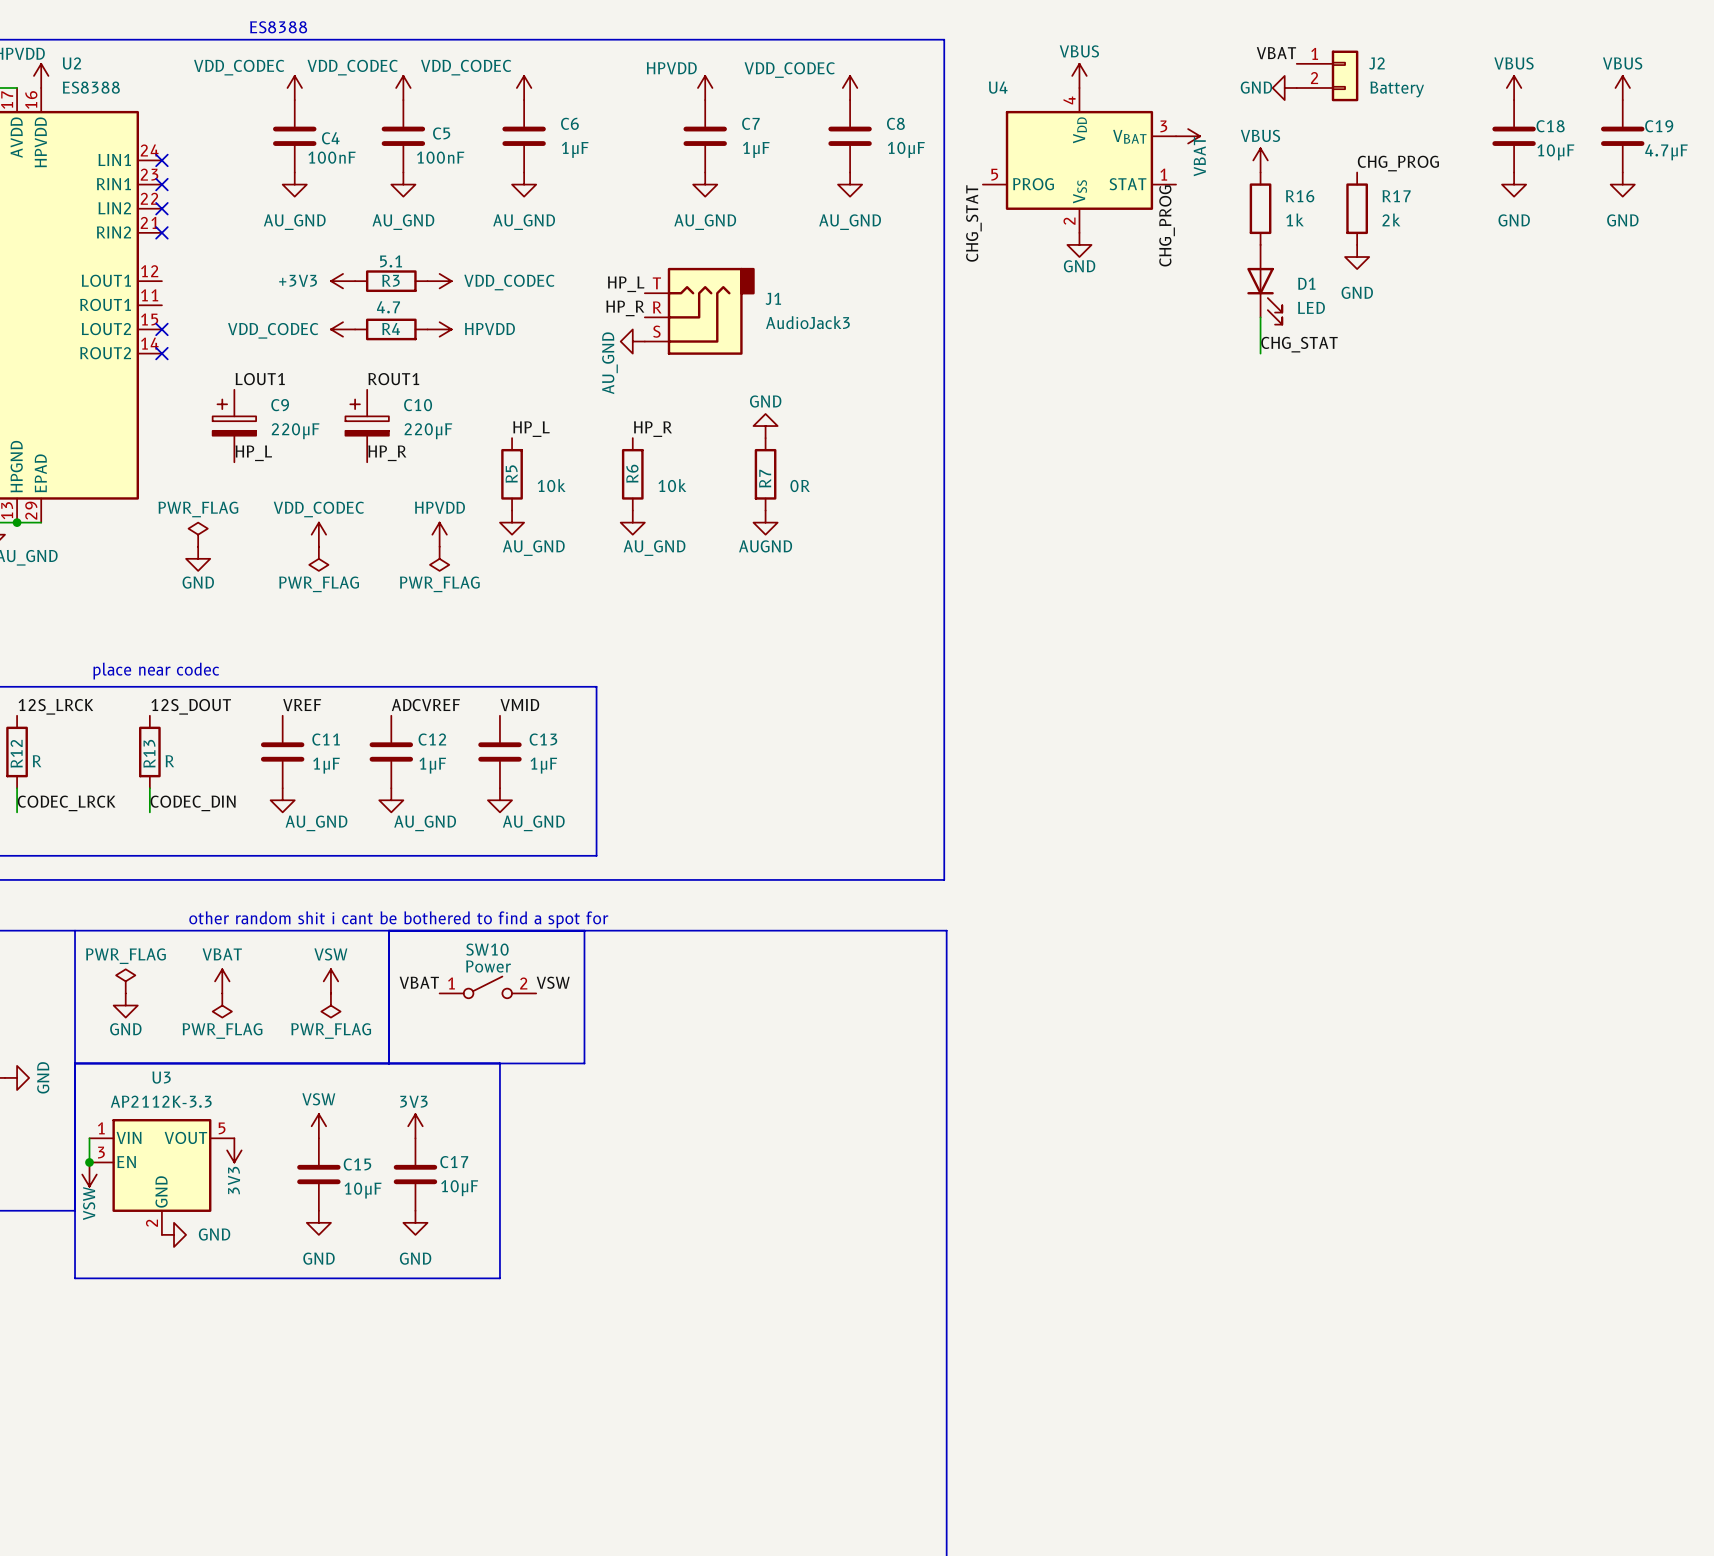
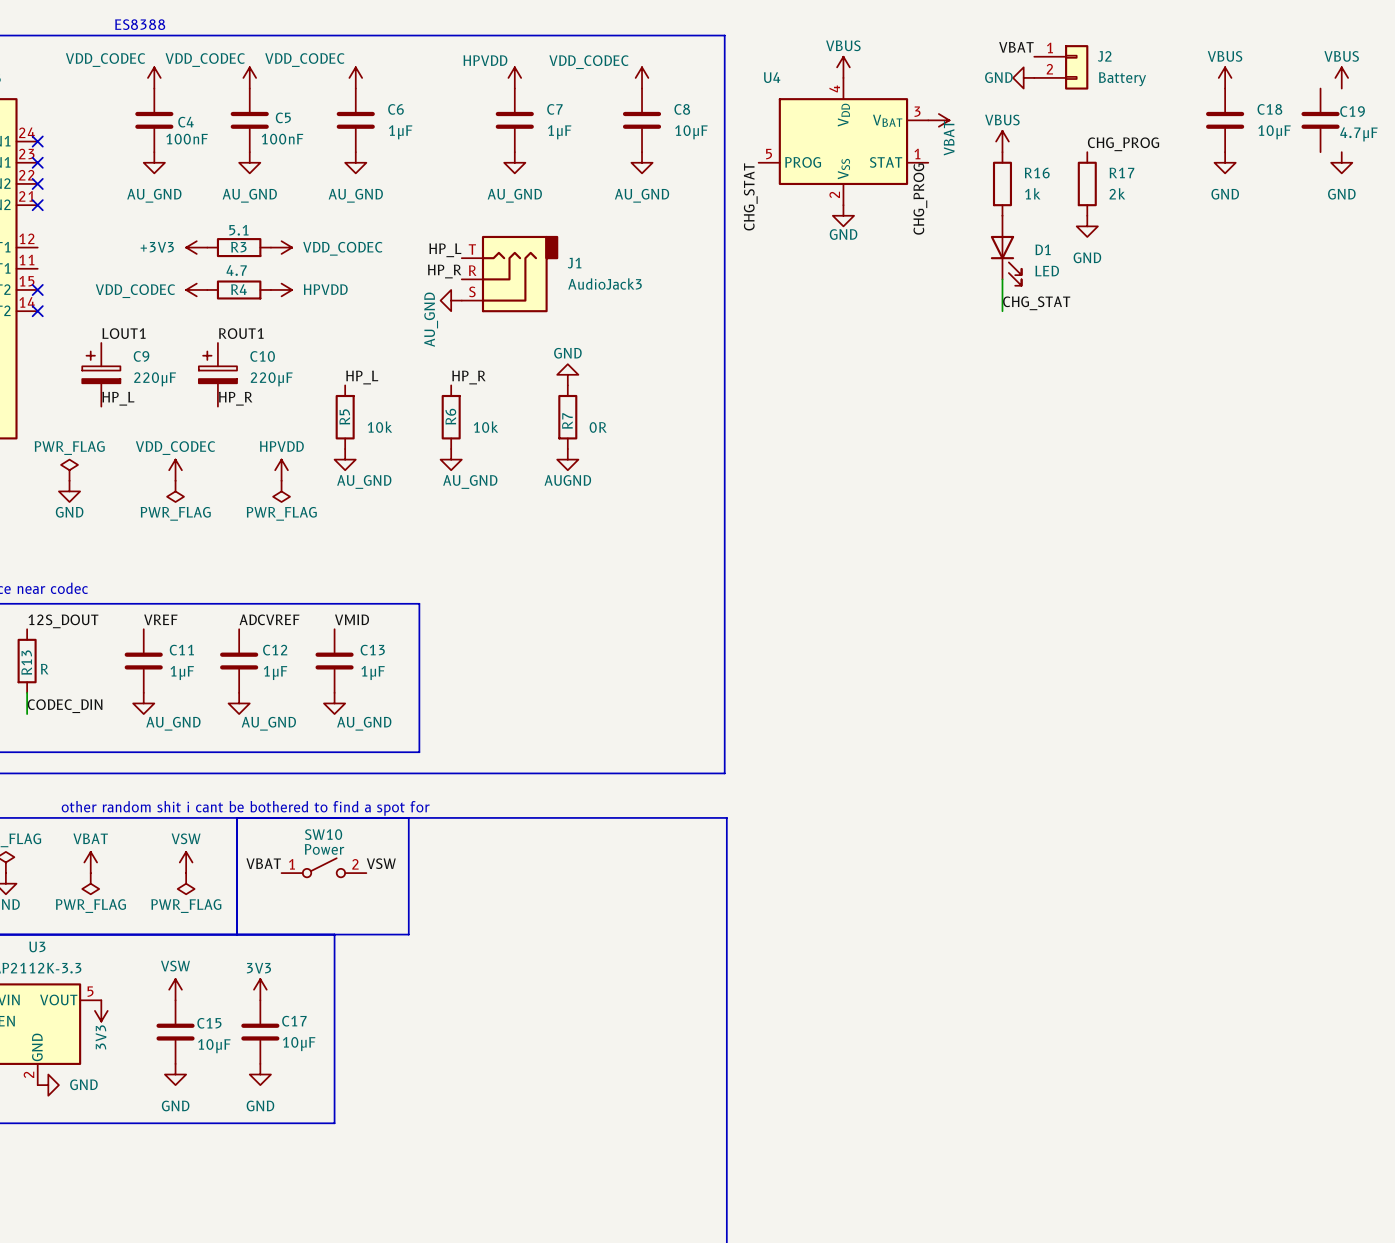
power symbol position: VBUS (1622, 87) -> VBUS (1341, 77)
C18 name position: C18 (1550, 126) -> C18 (1269, 109)
C18 value position: 10μF (1555, 152) -> 10μF (1274, 132)
power symbol position: GND (1622, 184) -> GND (1341, 162)

